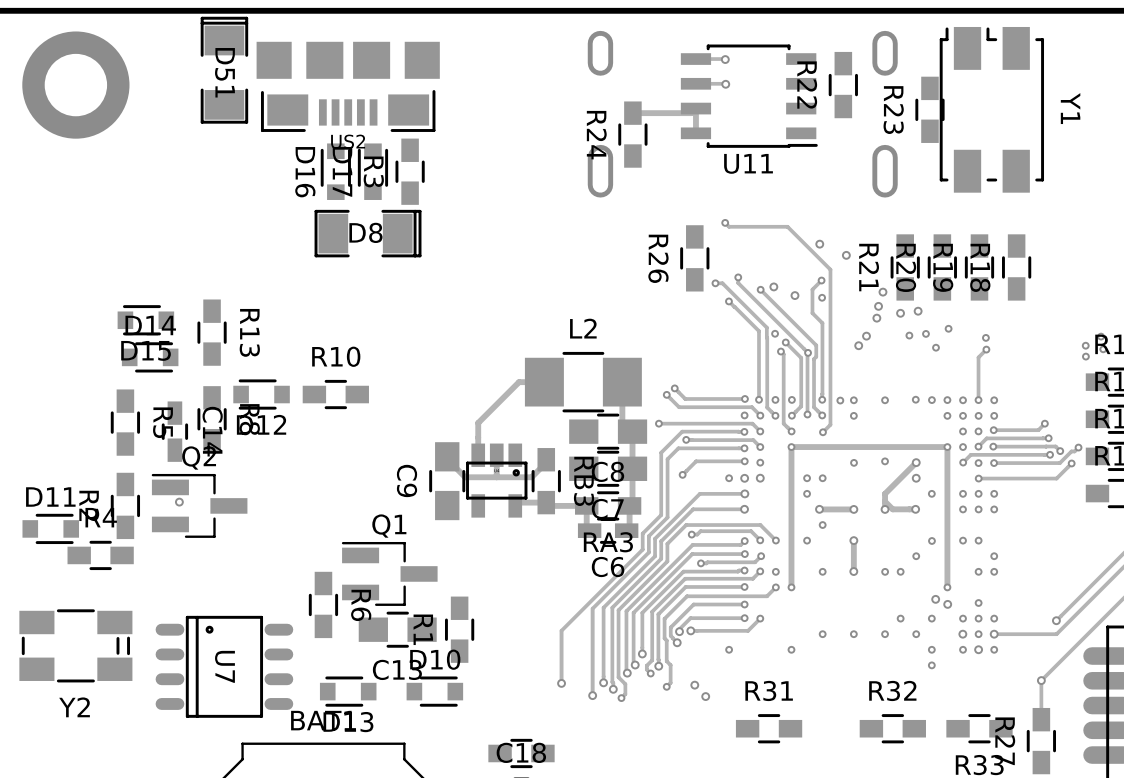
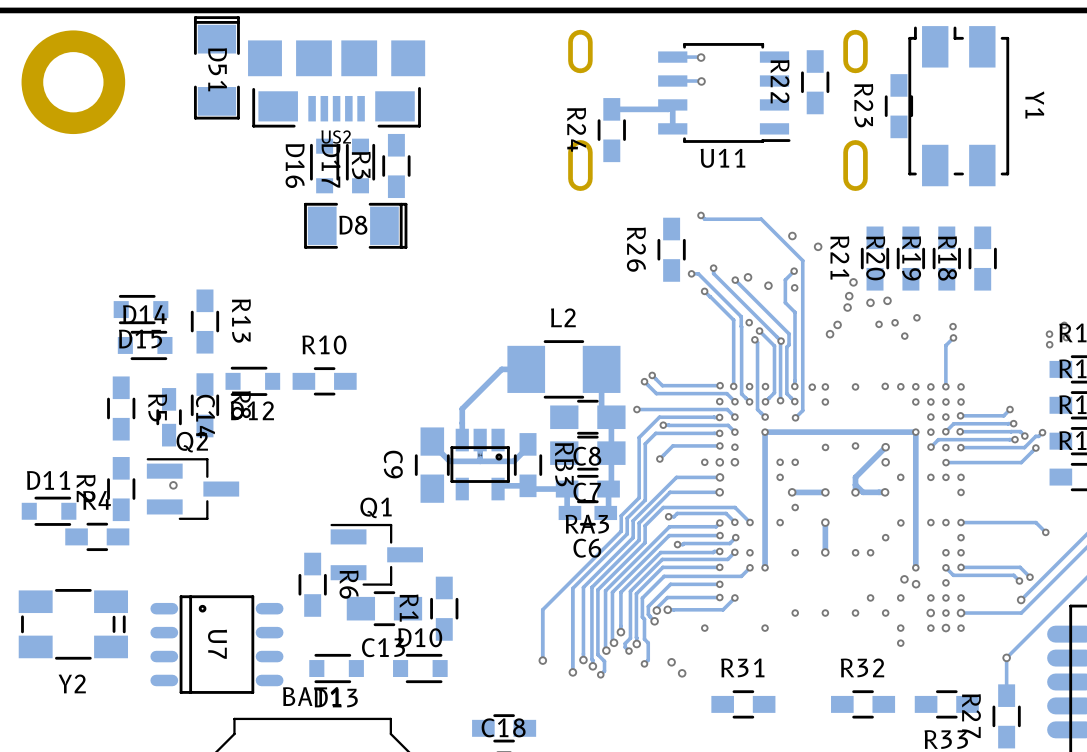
via: (963, 509) -> none
via: (978, 509) -> none
track: none -> (961, 522) (1035, 522) (1045, 532)
via: none -> (961, 522)
via: none -> (1045, 532)
track: none -> (961, 567) (1020, 567) (1030, 577)
via: none -> (961, 567)
track: none -> (945, 567) (953, 575) (1013, 575) (1019, 580)
via: none -> (945, 567)
via: none -> (1030, 577)
via: none -> (1019, 580)

